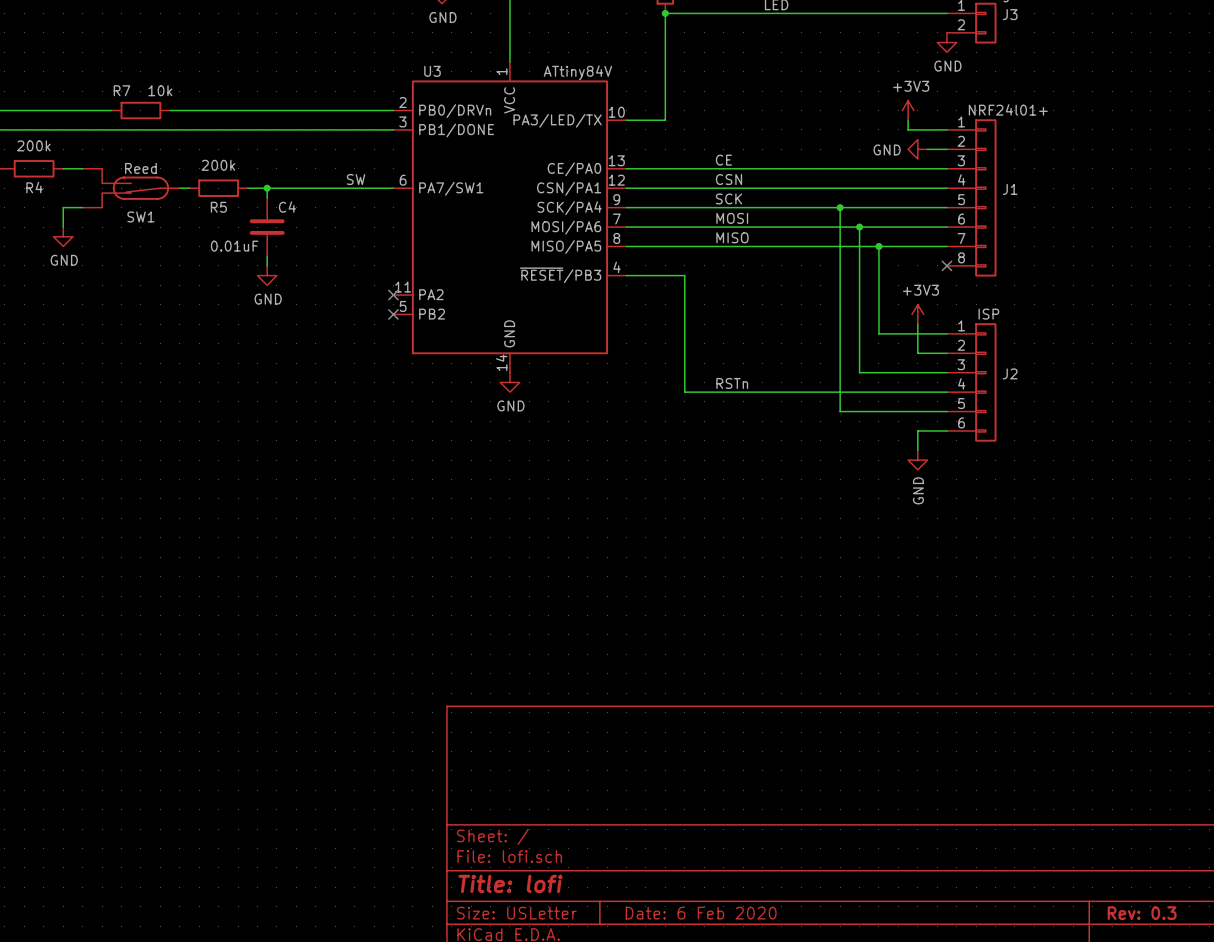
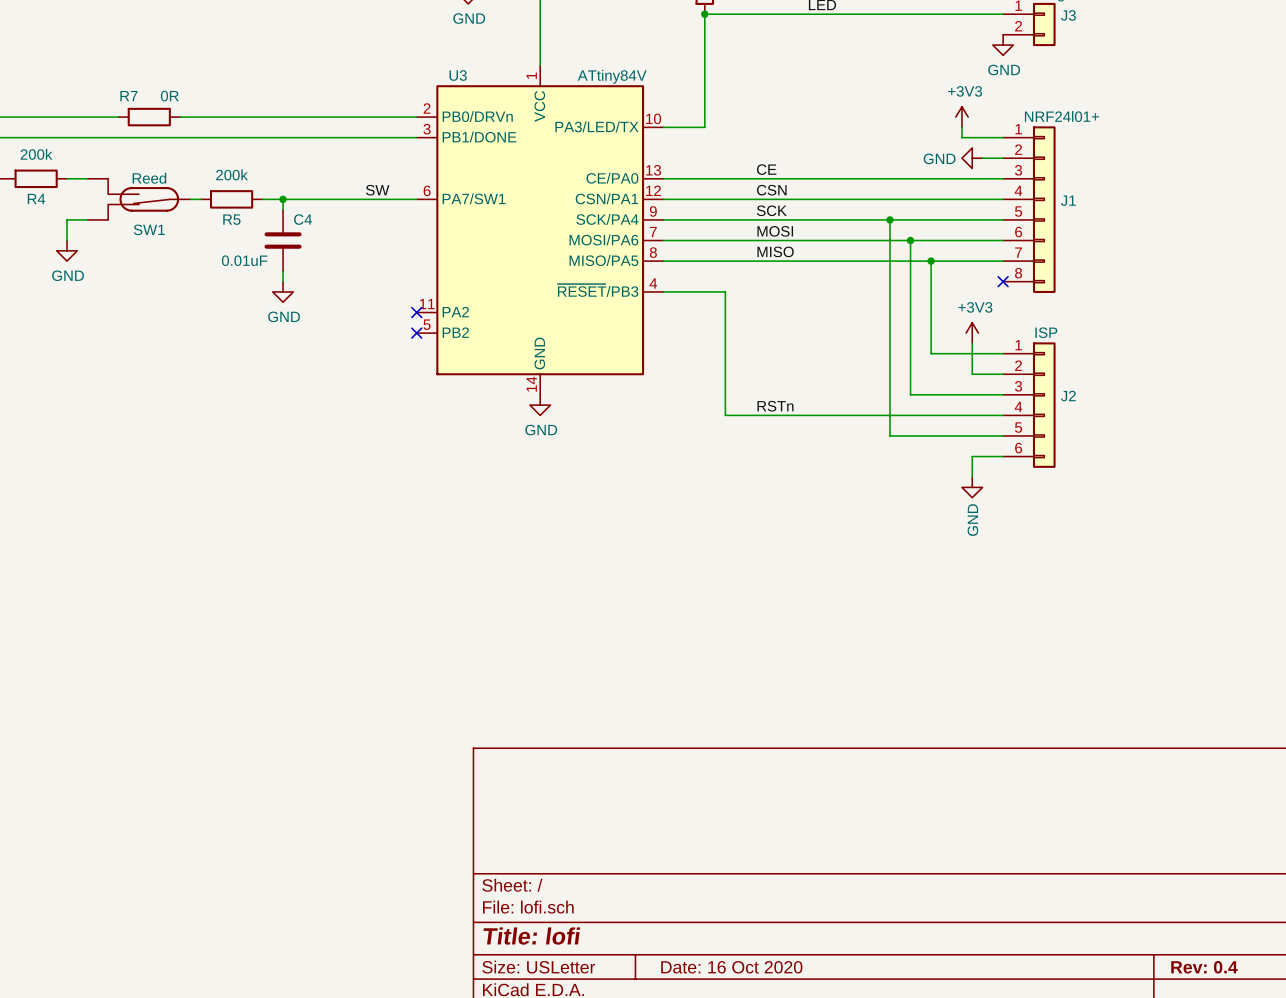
R7 value: 10k (160, 90) -> 0R (169, 96)
title block: Date: 6 Feb 2020 (701, 913) -> Date: 16 Oct 2020 (731, 967)
title block: Rev: 0.3 (1142, 913) -> Rev: 0.4 (1204, 967)

